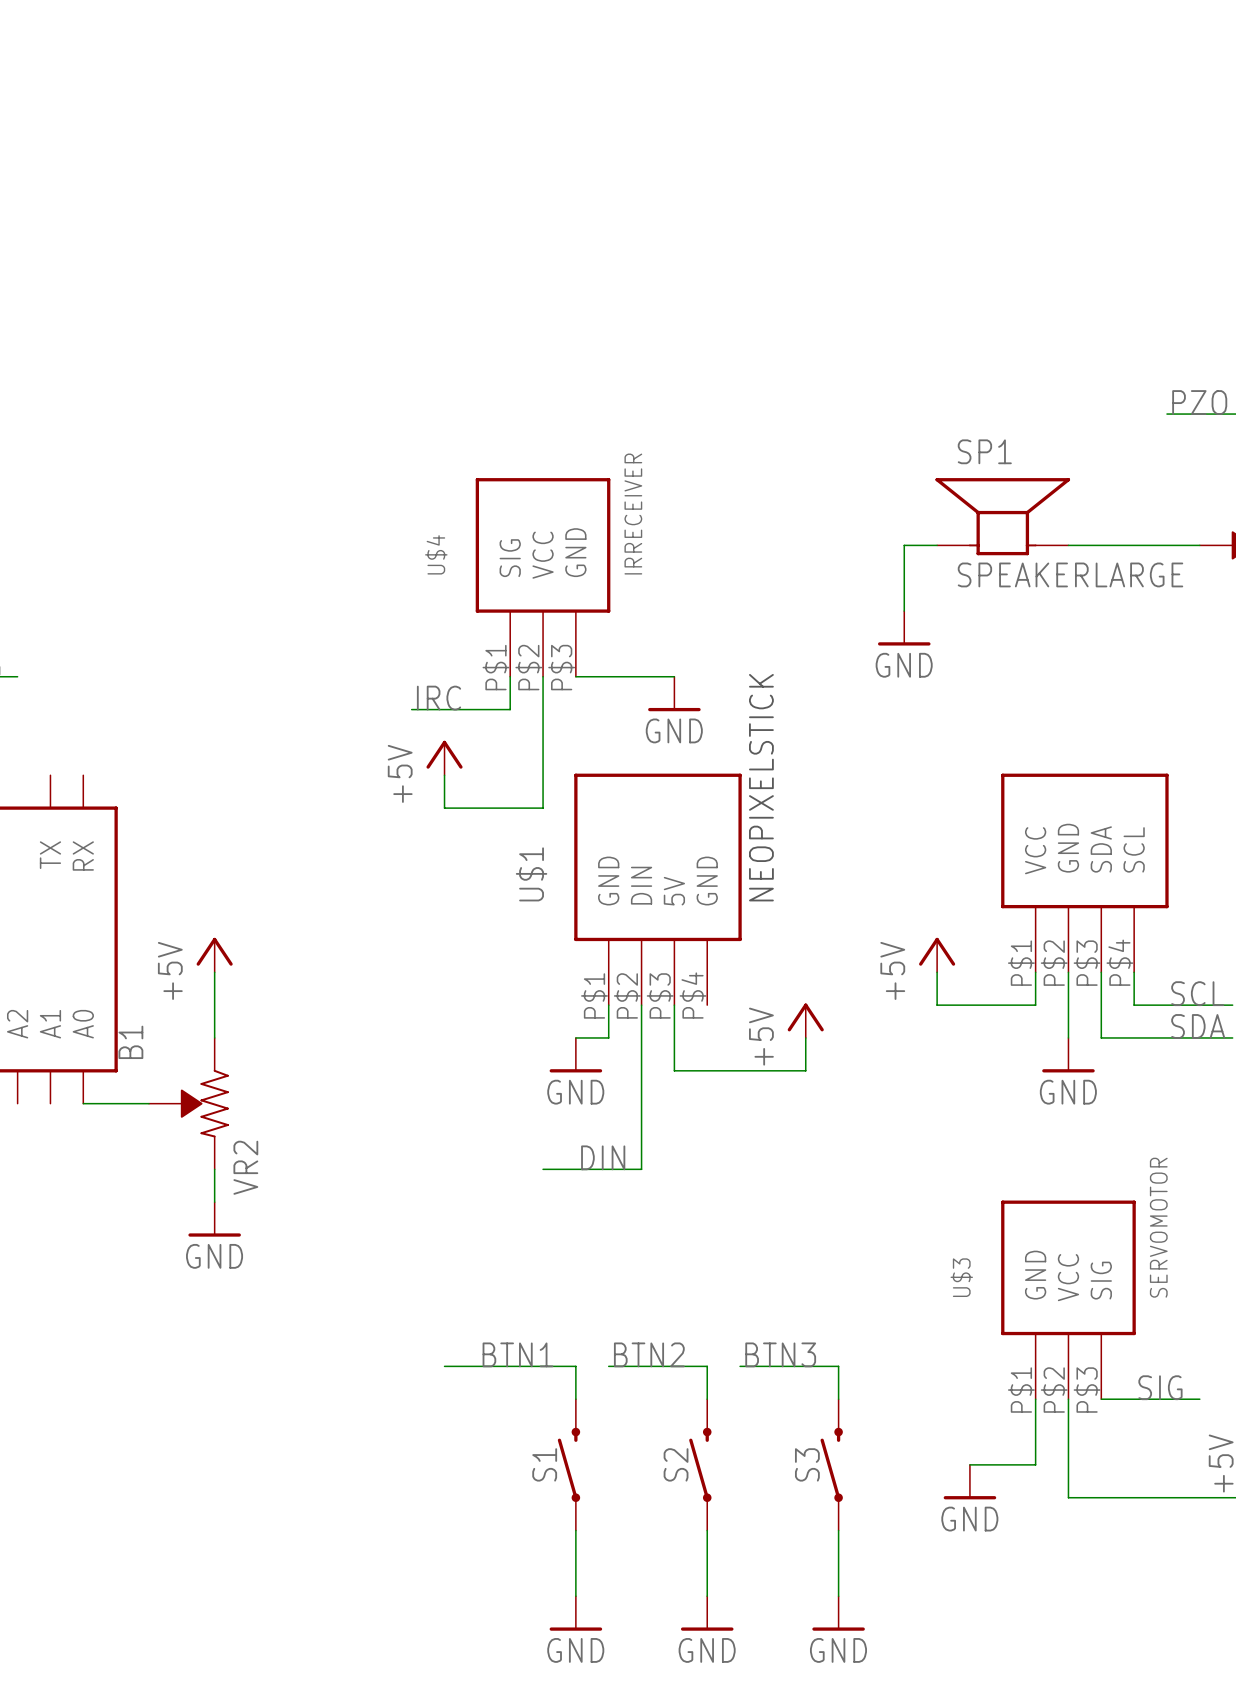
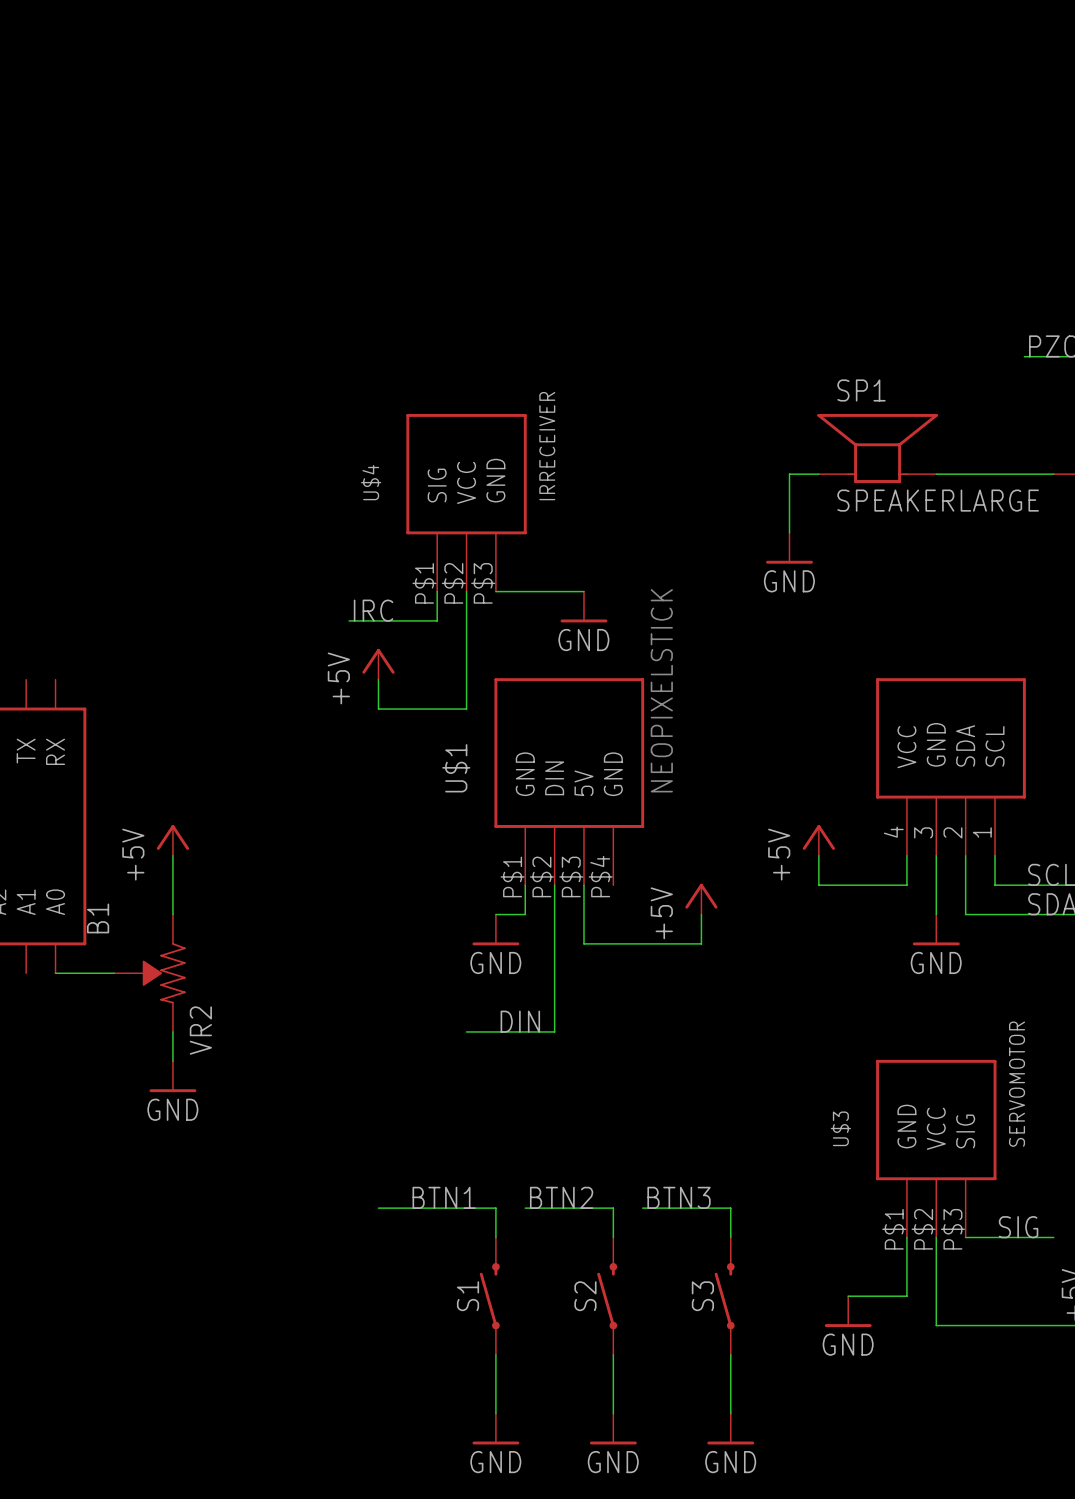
part pin number: P$4 (1119, 962) -> 1 (982, 832)
part pin number: P$1 (1021, 963) -> 4 (893, 832)
part pin number: P$2 (1054, 963) -> 3 (923, 832)
part pin number: P$3 (1087, 963) -> 2 (952, 832)

